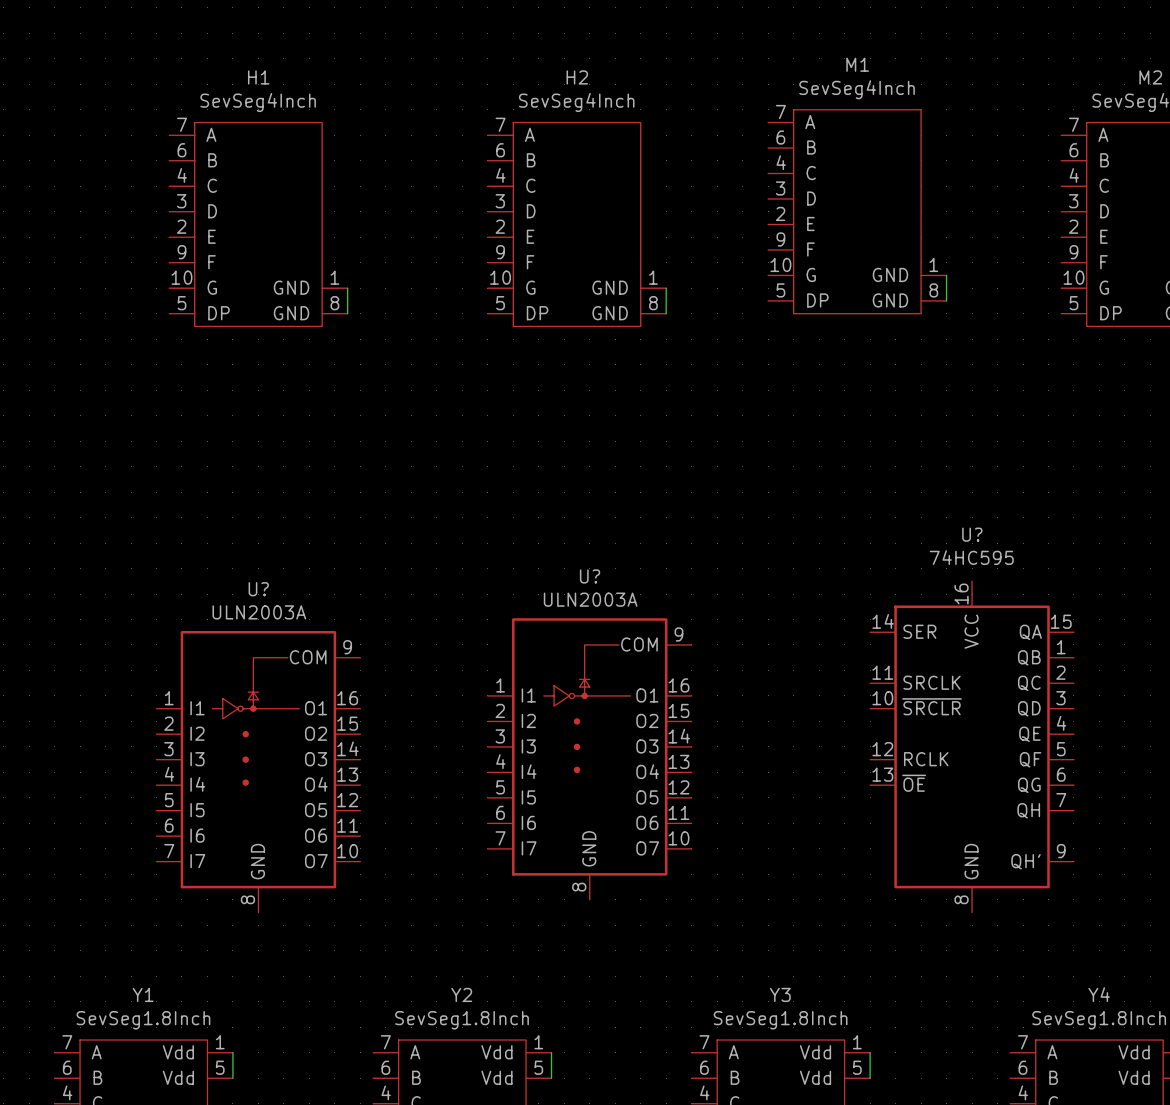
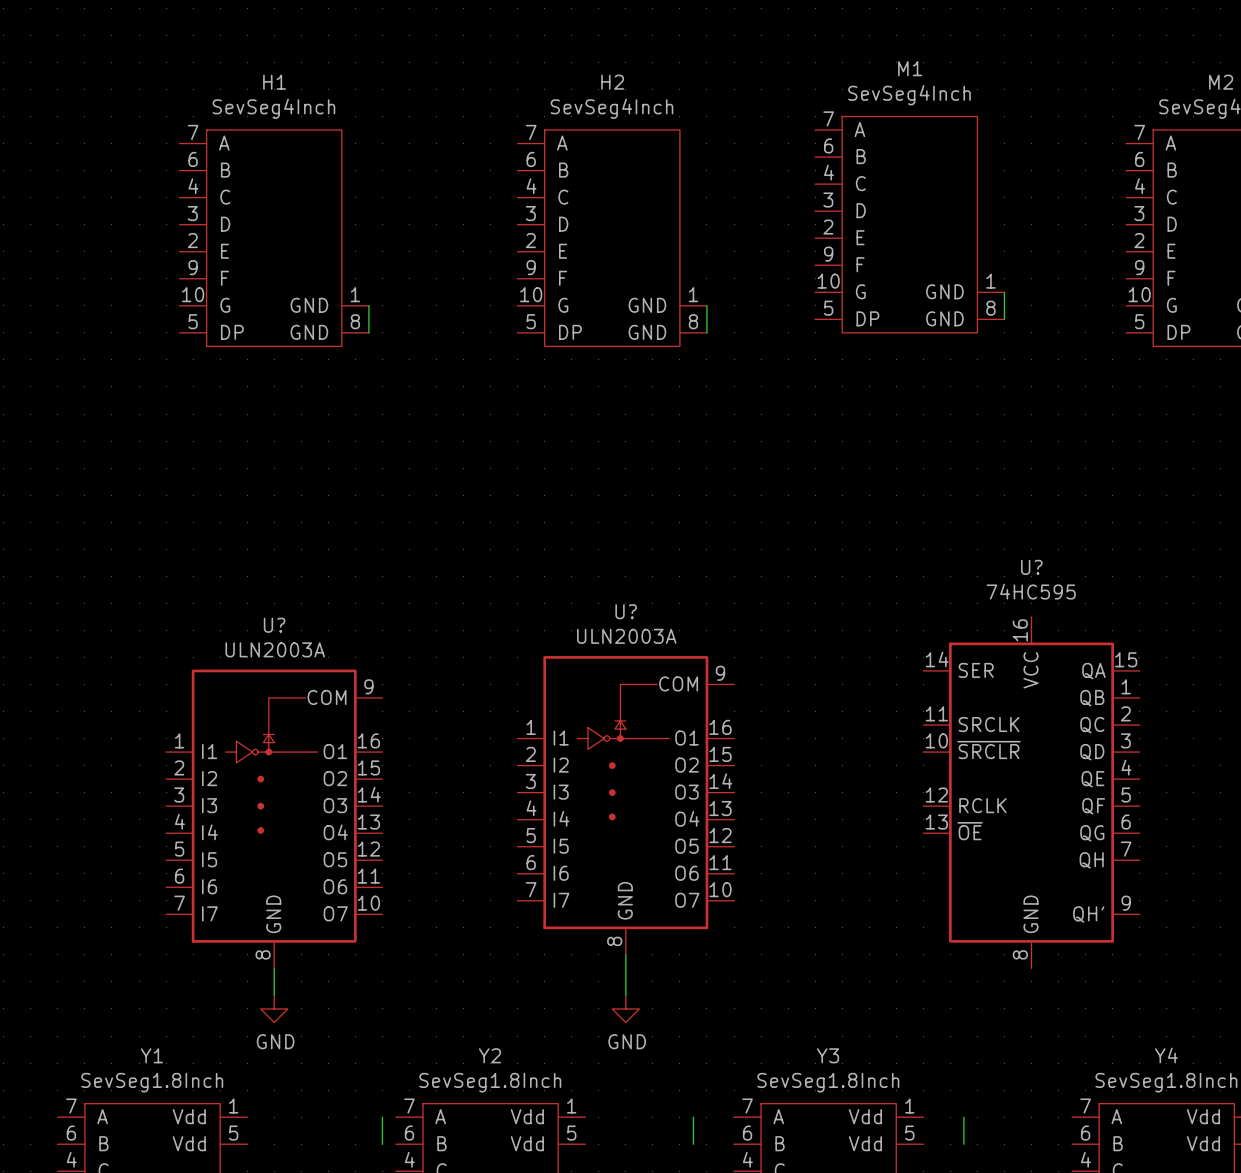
wire: none -> (625, 954) (625, 995)
wire: none -> (274, 968) (274, 995)
power symbol: none -> GND (274, 1008)
power symbol: none -> GND (625, 1008)
wire: (232, 1052) (232, 1078) -> (382, 1117) (382, 1144)
wire: (551, 1052) (551, 1078) -> (693, 1117) (693, 1144)
wire: (870, 1052) (870, 1078) -> (963, 1117) (963, 1144)

